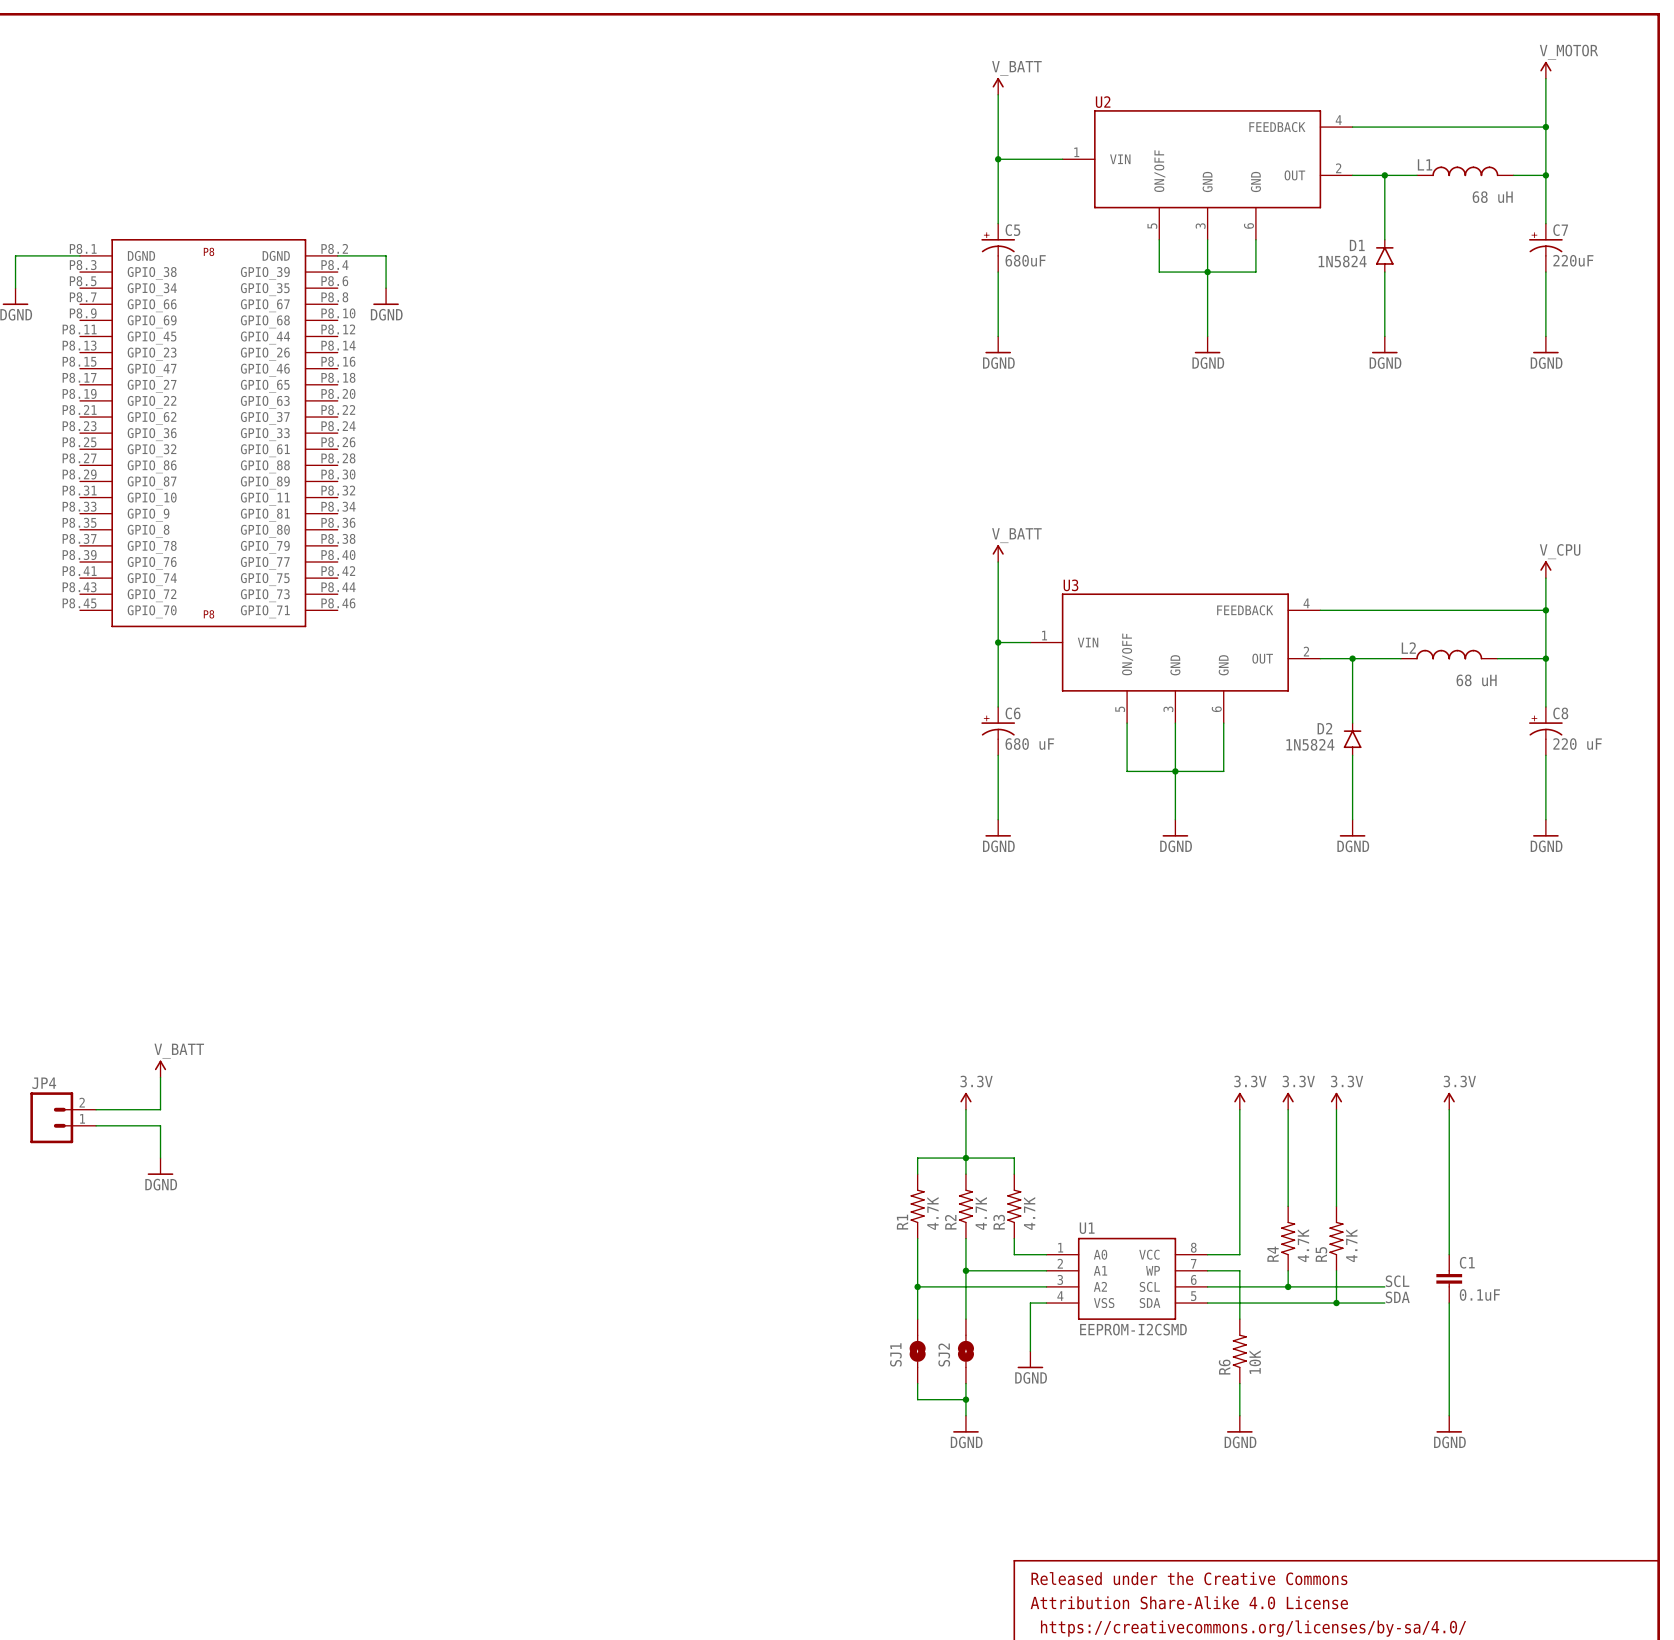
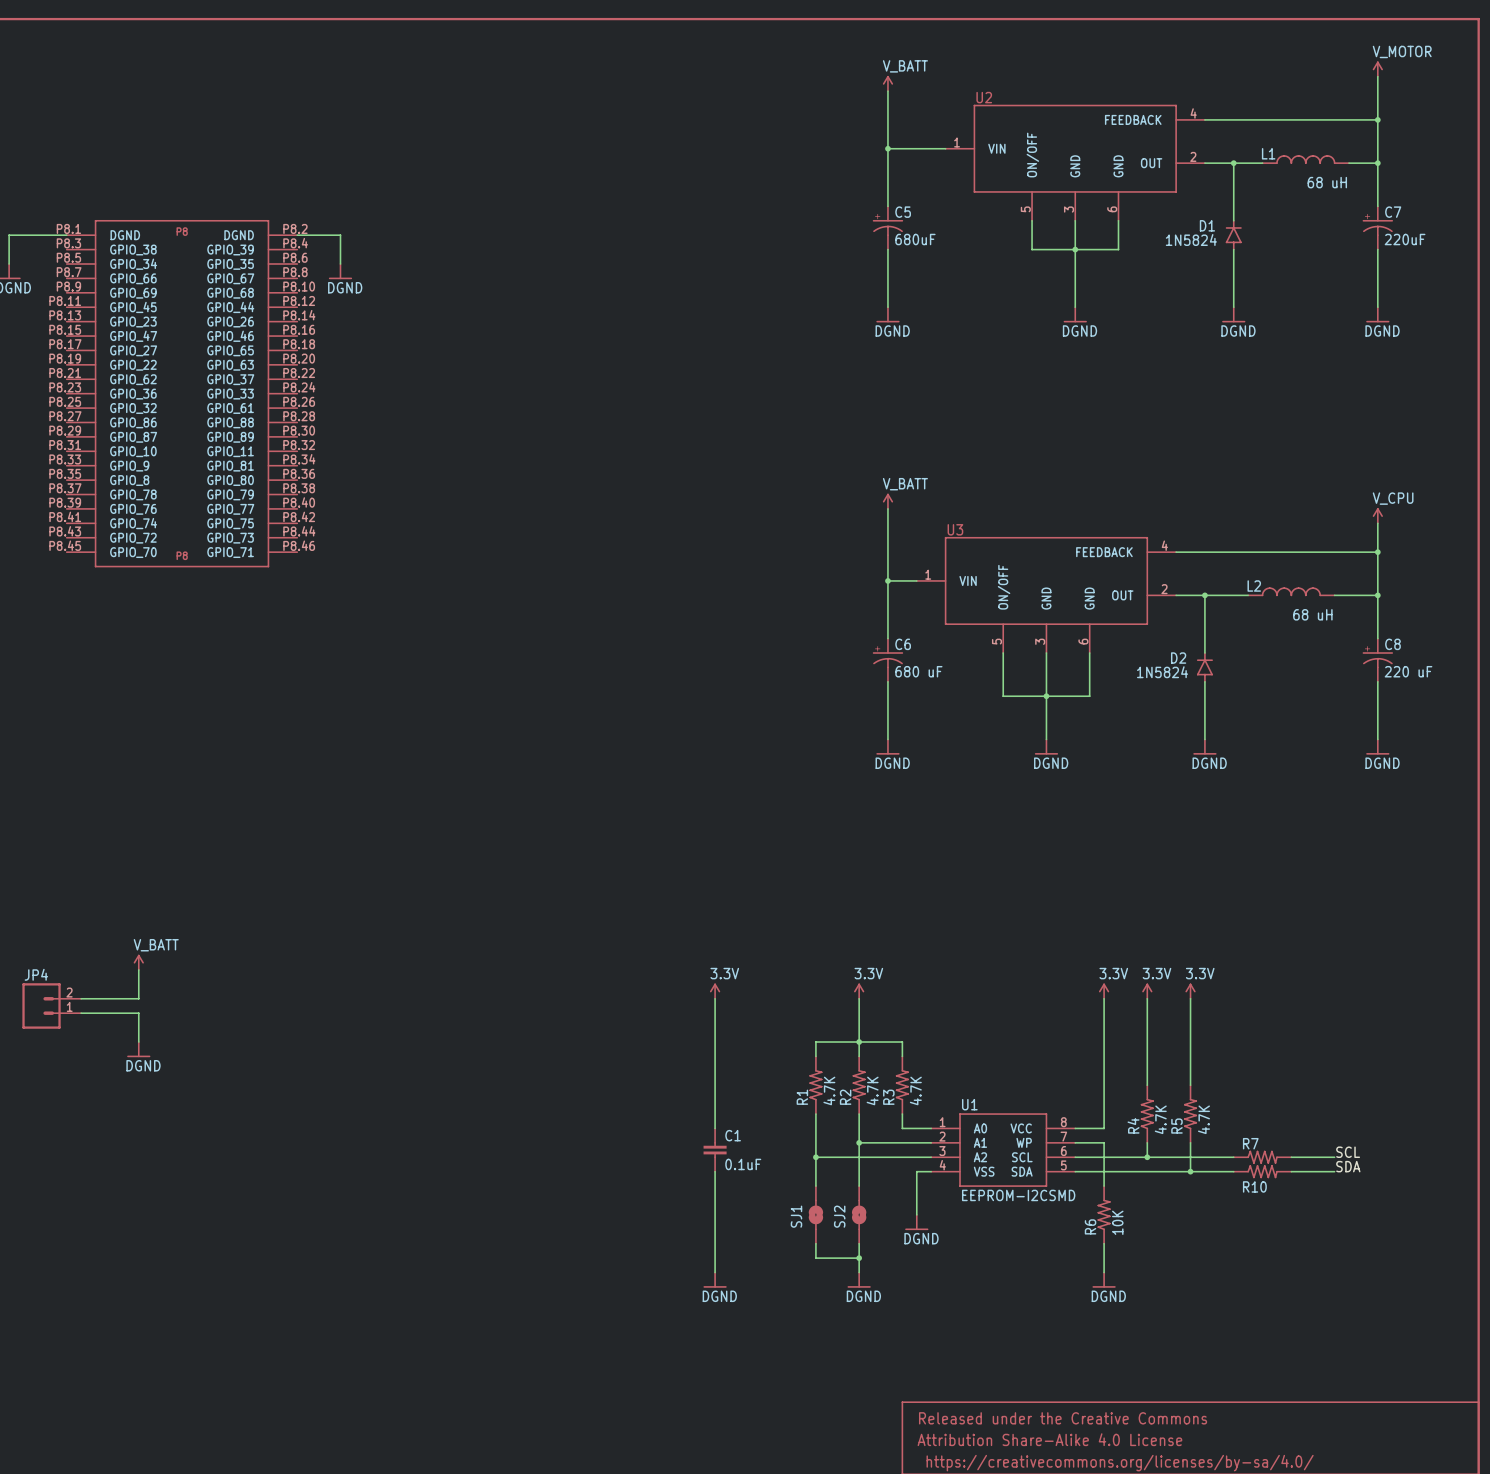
power symbol: none -> 3.3V (715, 991)
power symbol: 3.3V (1449, 1101) -> none
wire: none -> (715, 998) (715, 1128)
wire: (1449, 1109) (1449, 1254) -> none
C1 position: (1449, 1278) -> (715, 1150)
label position: SCL (1397, 1281) -> SCL (1348, 1152)
R7: none -> (1262, 1157)
wire: none -> (1291, 1157) (1334, 1157)
label position: SDA (1397, 1297) -> SDA (1348, 1166)
wire: none -> (715, 1171) (715, 1272)
R10: none -> (1262, 1171)
wire: (1449, 1303) (1449, 1415) -> (1291, 1171) (1334, 1171)
power symbol: none -> DGND (715, 1280)
power symbol: DGND (1449, 1424) -> none

